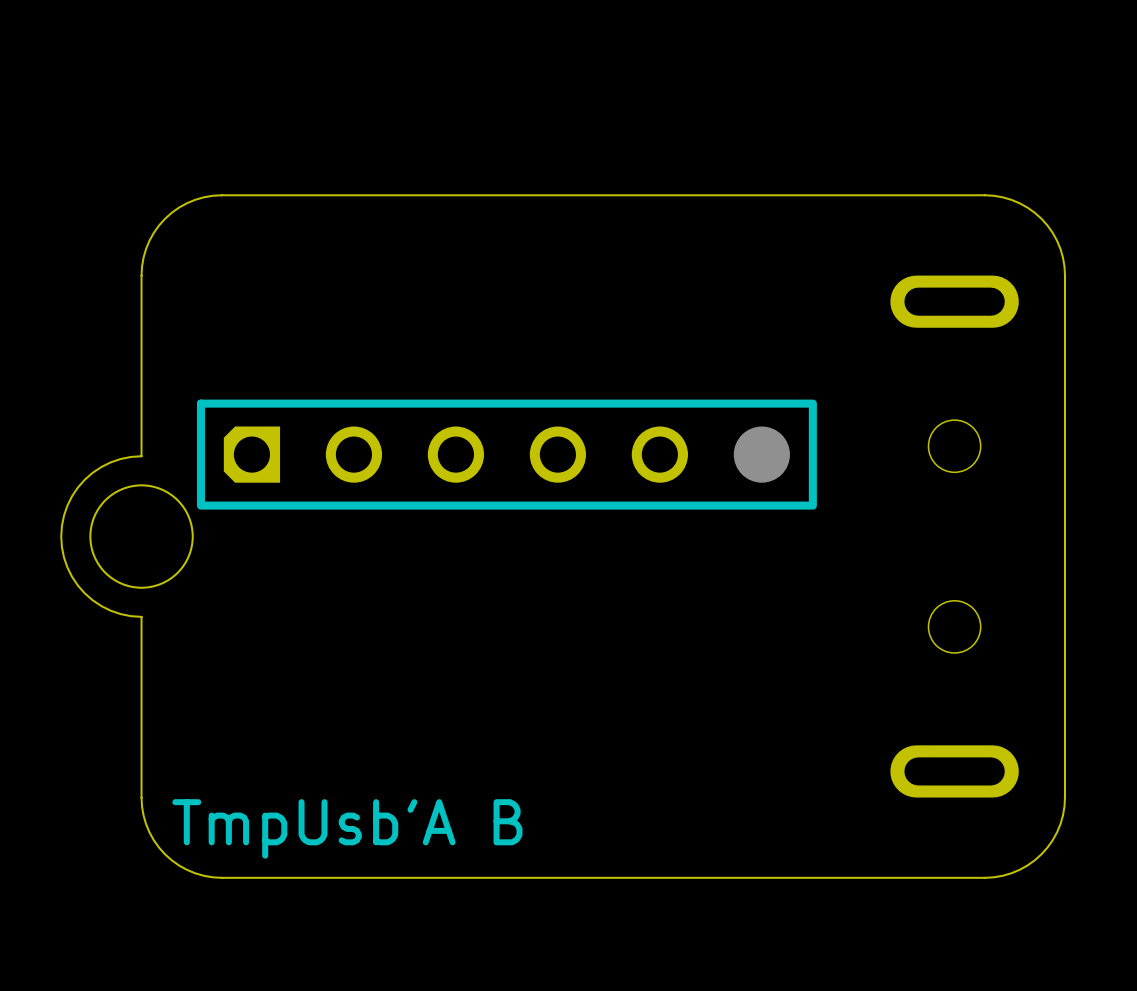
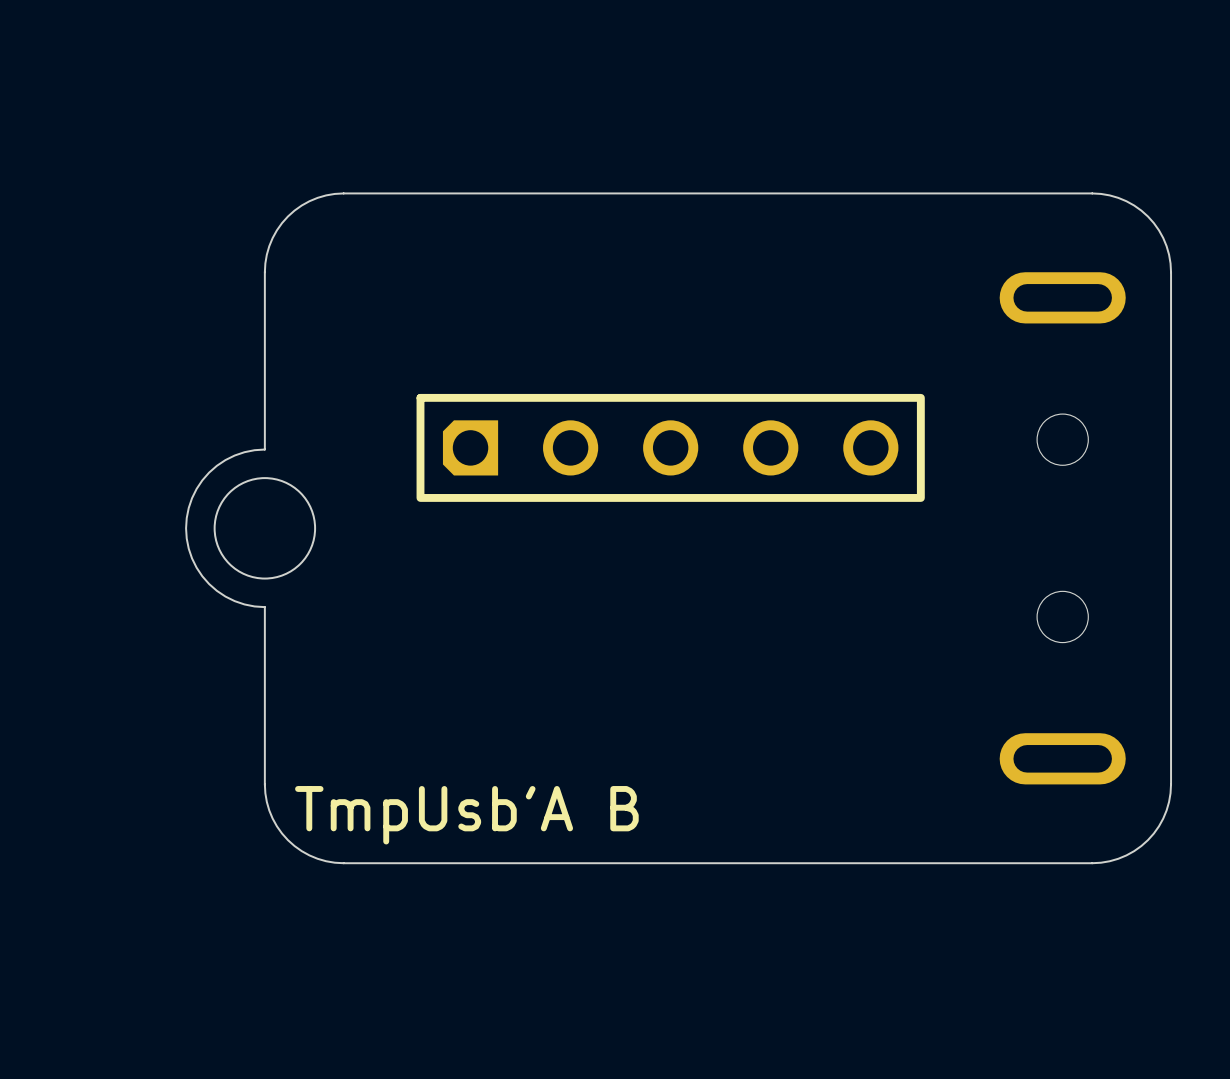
part: (506, 454) -> none
part: none -> (670, 447)

